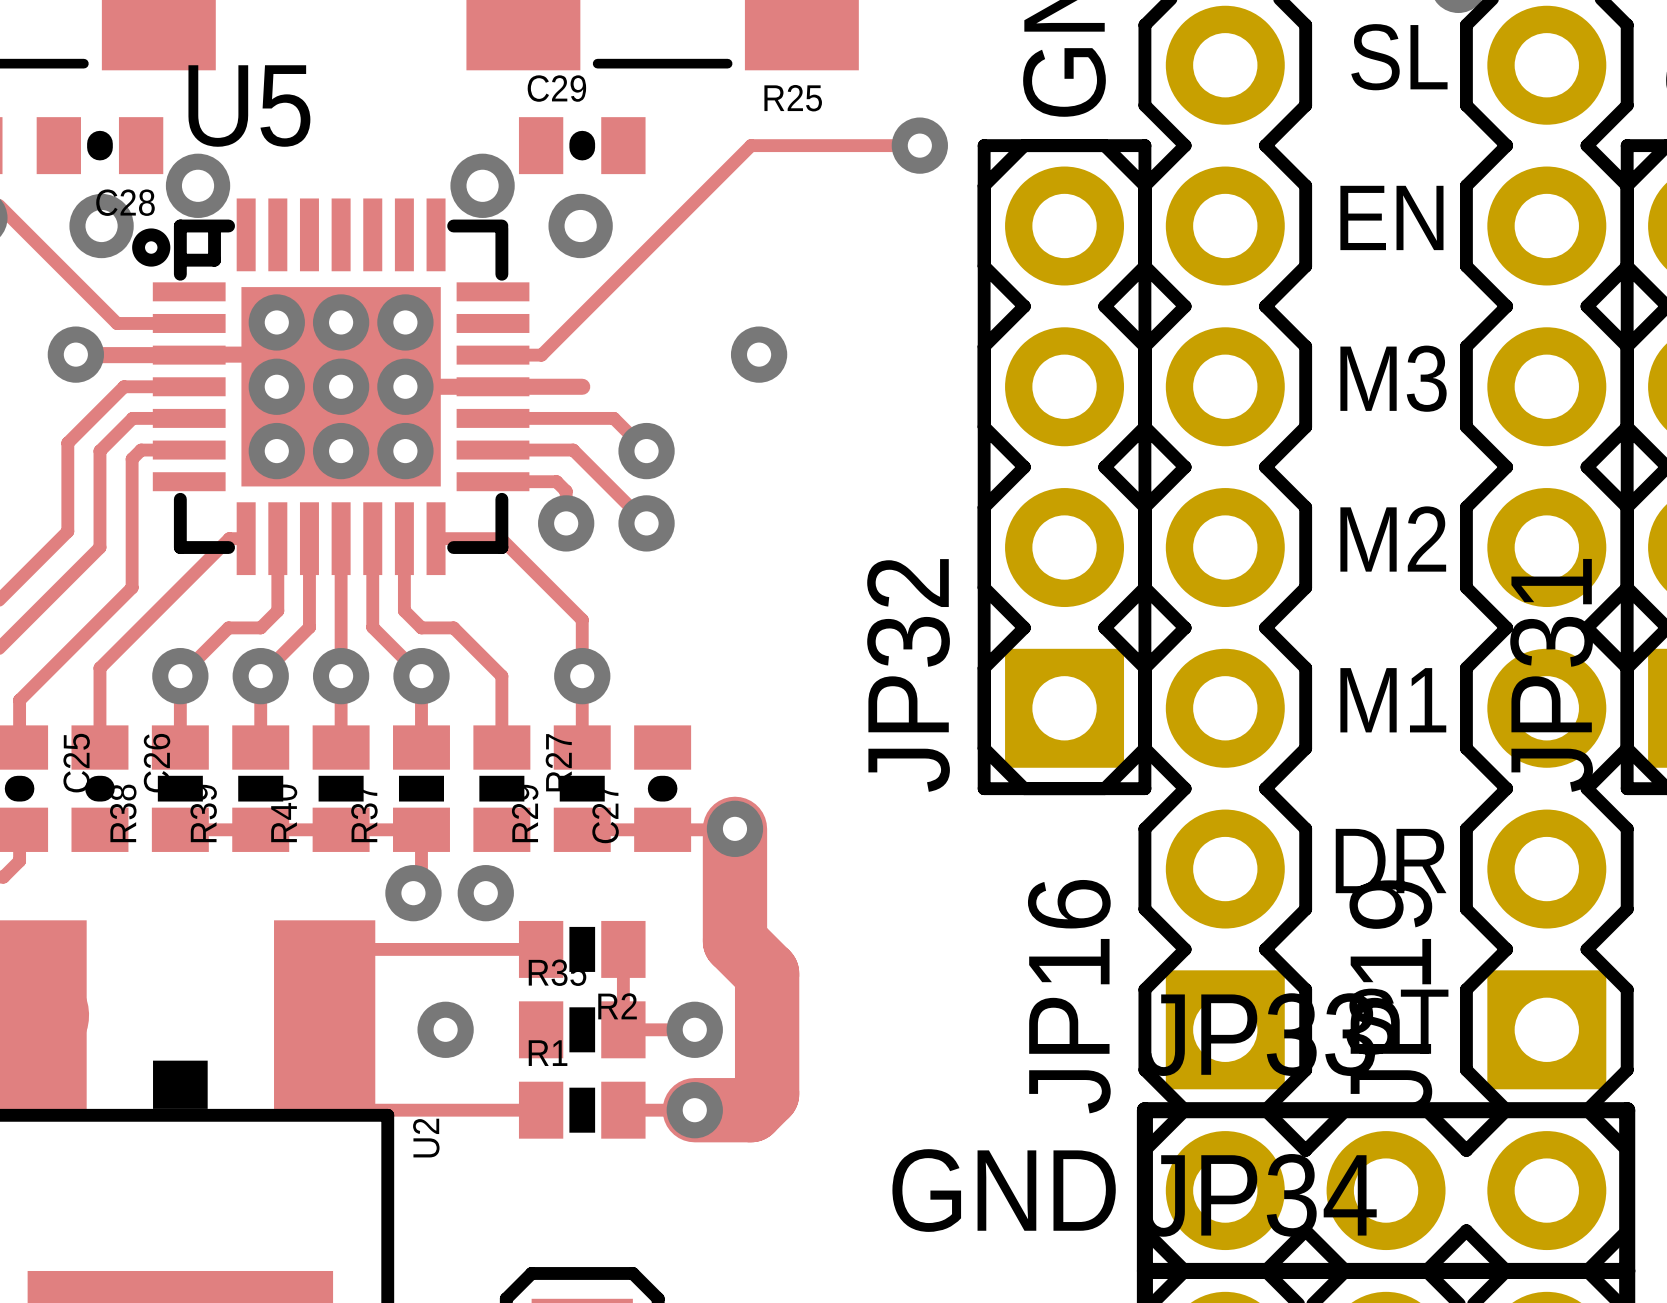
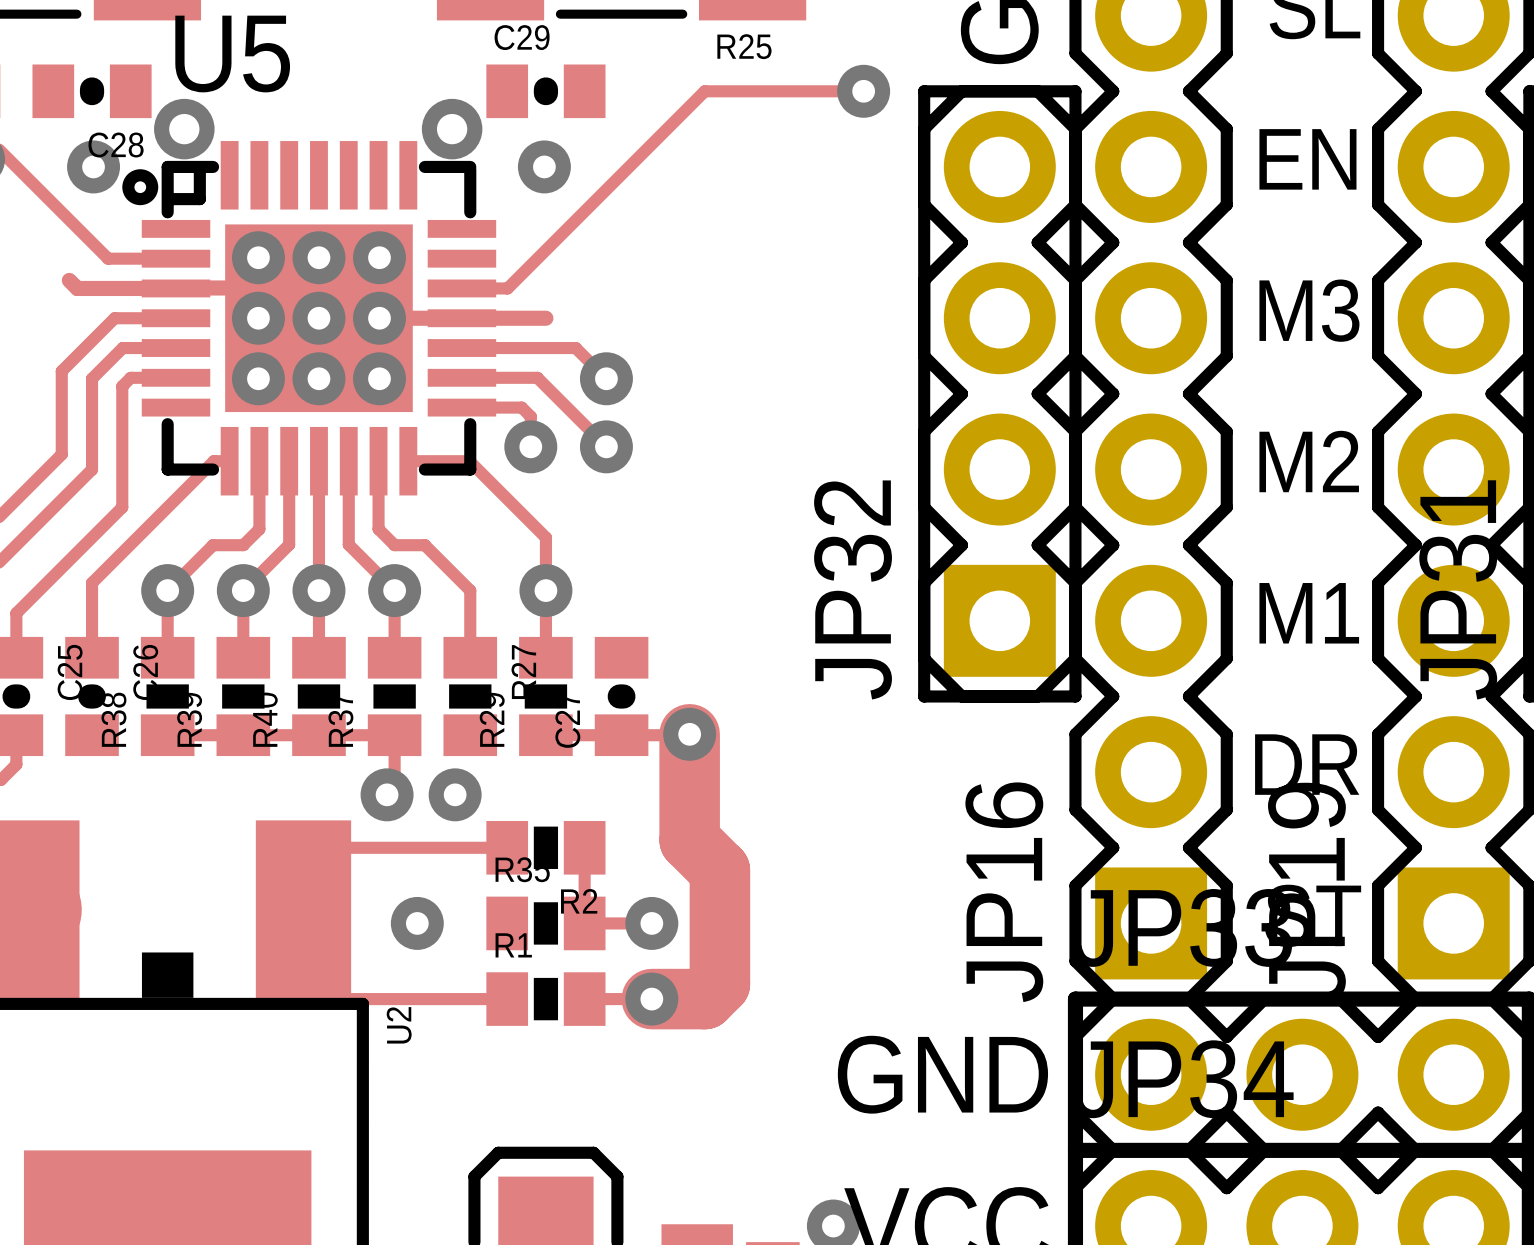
via: (101, 226) -> none
via: (580, 226) -> none
via position: (75, 354) -> (93, 166)
via position: (759, 354) -> (544, 166)

